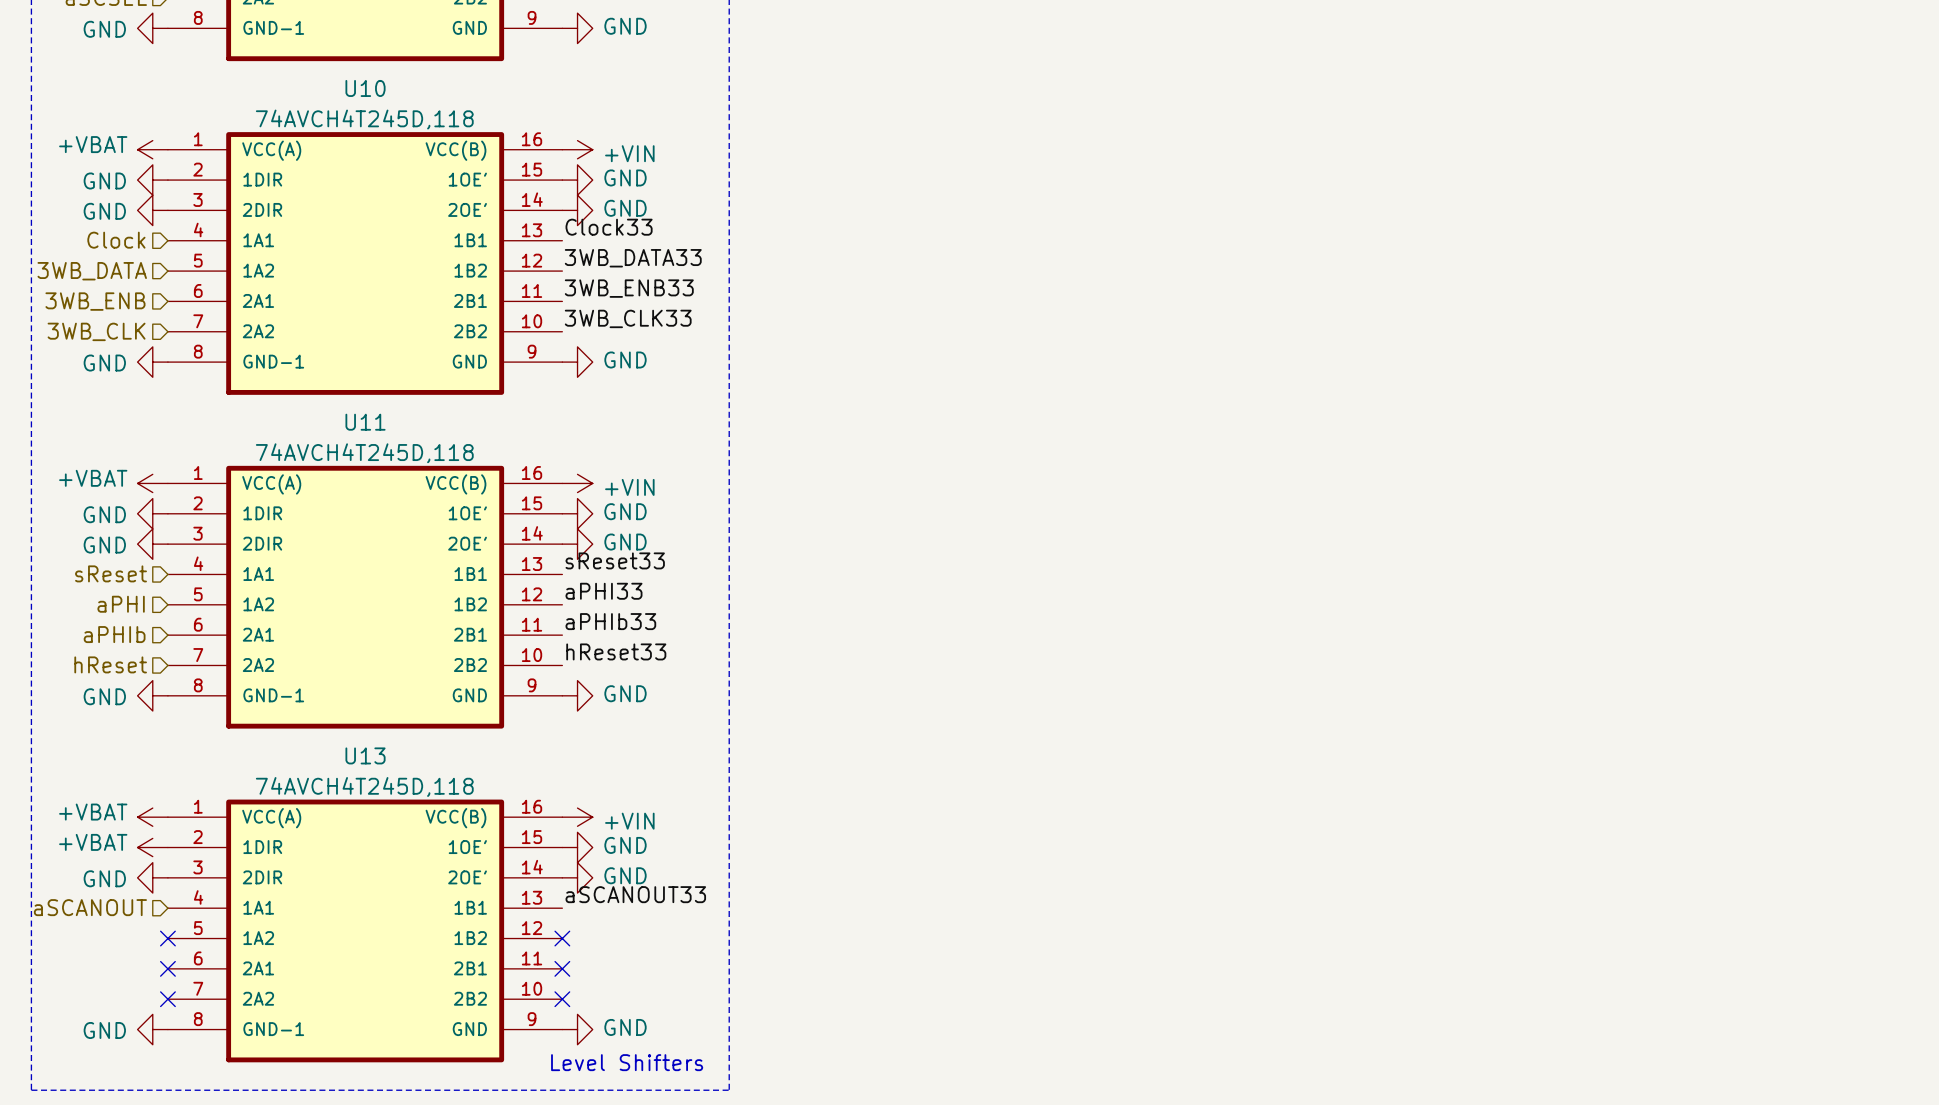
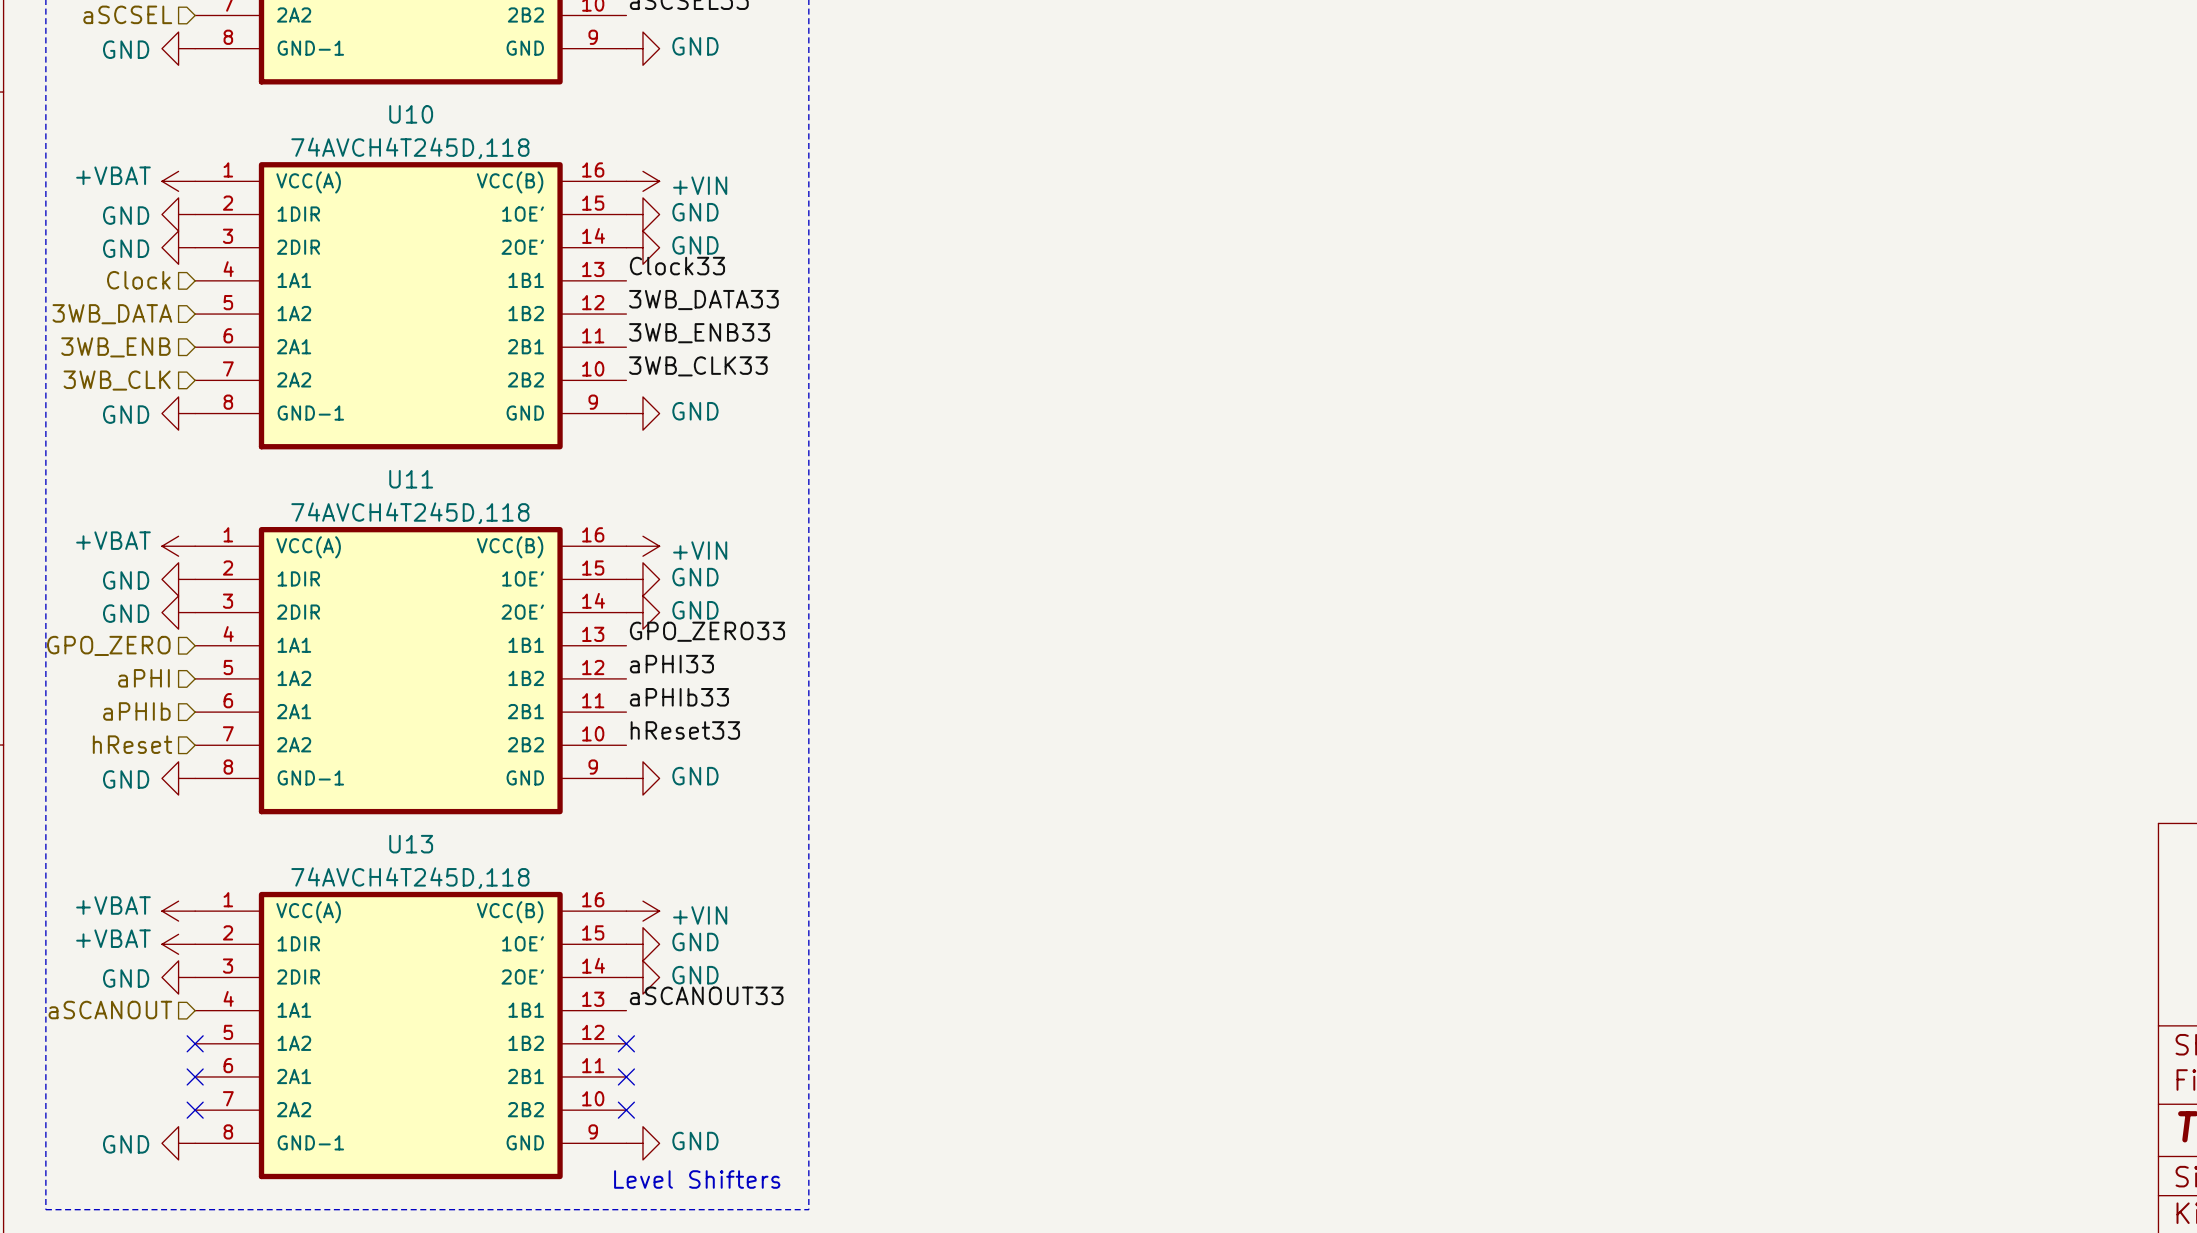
label: sReset33 (615, 560) -> GPO_ZERO33 (707, 631)
hierarchical label: sReset (111, 573) -> GPO_ZERO (108, 645)

